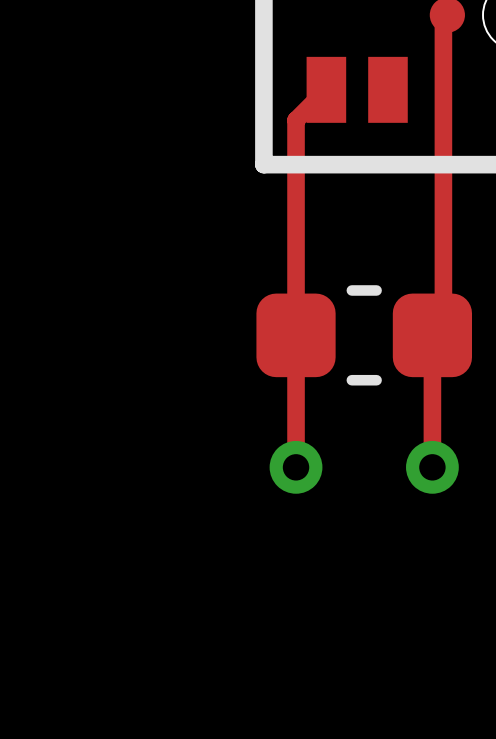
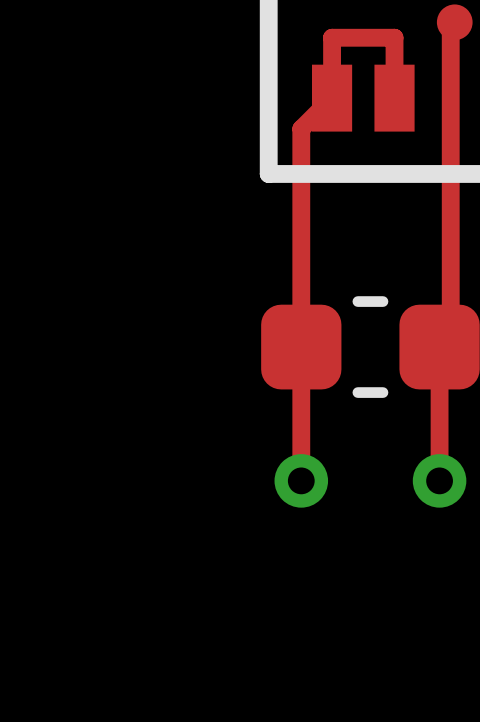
top track: none -> (332, 98) (332, 37) (394, 37) (394, 98)

